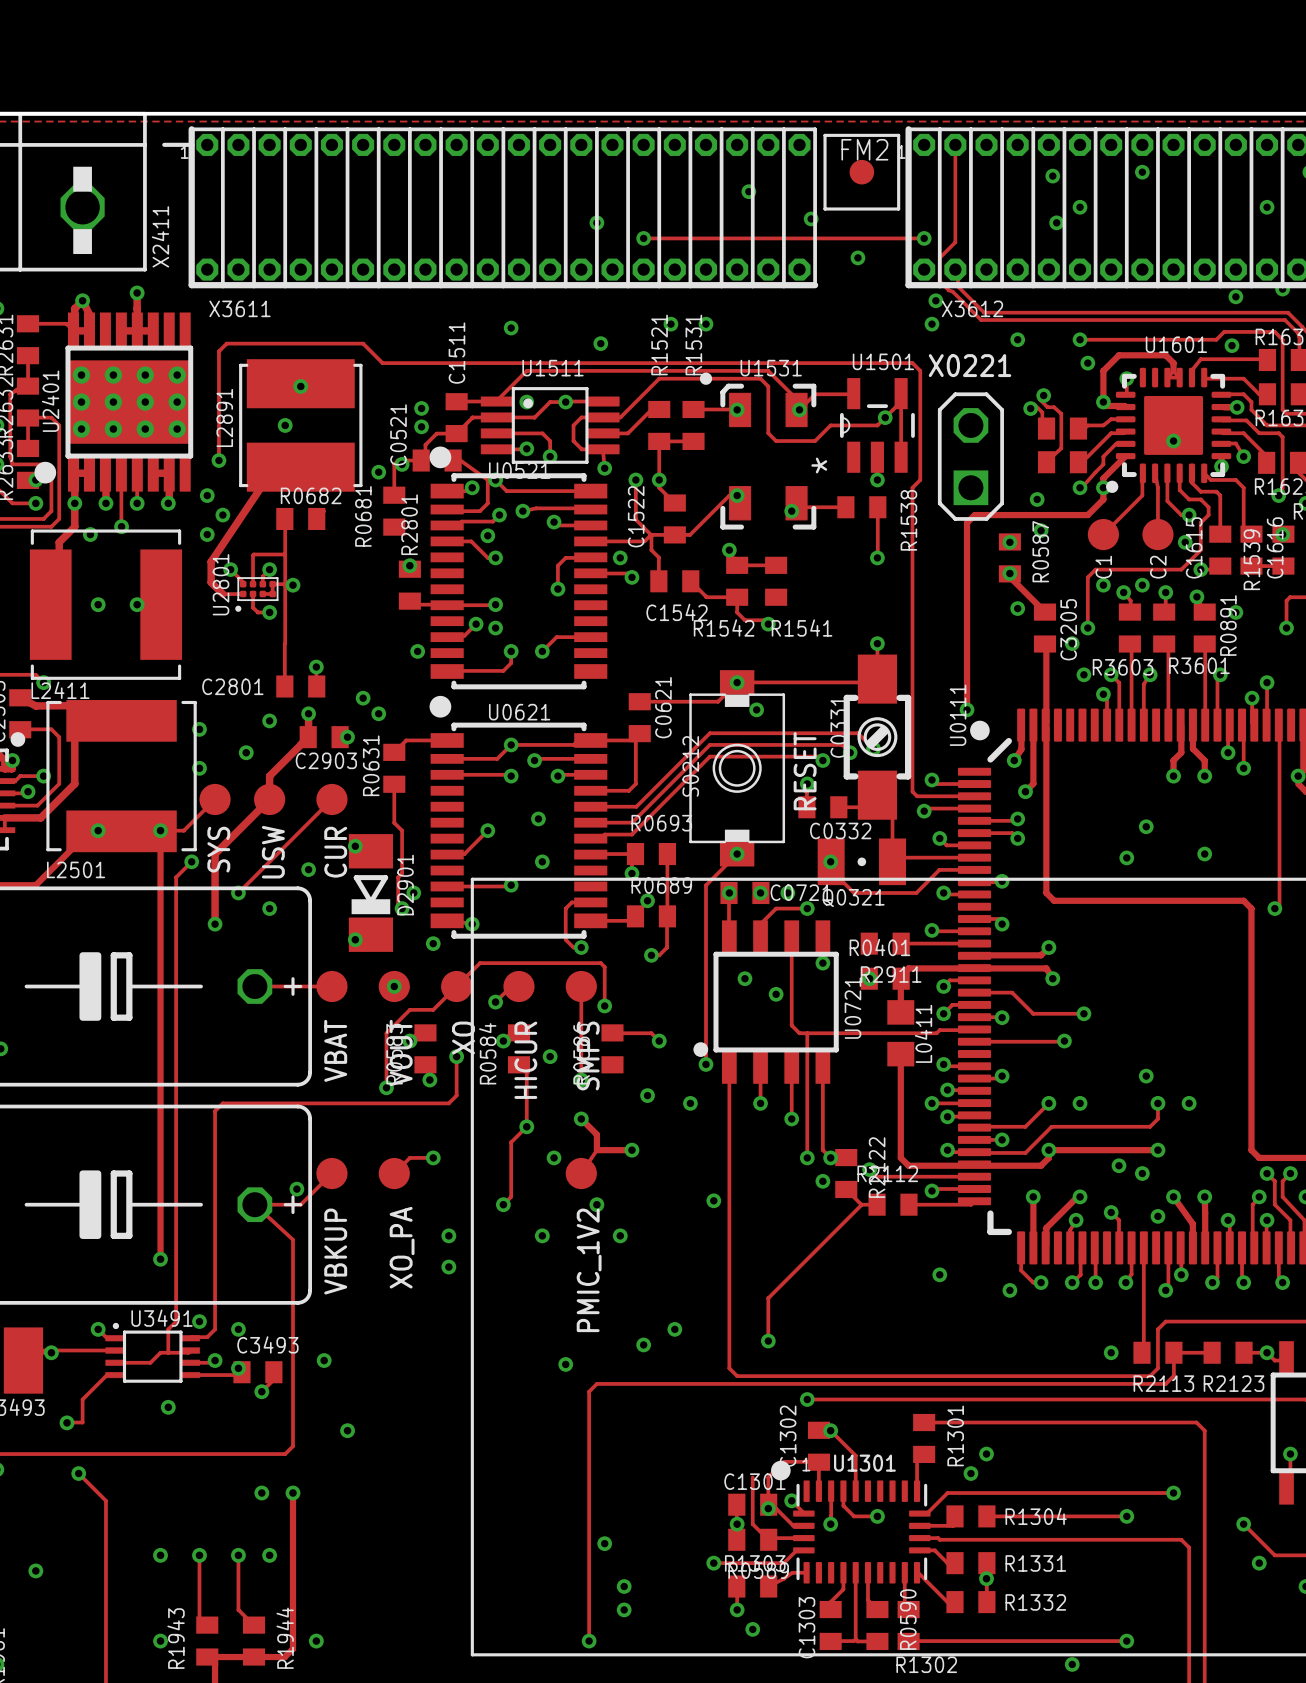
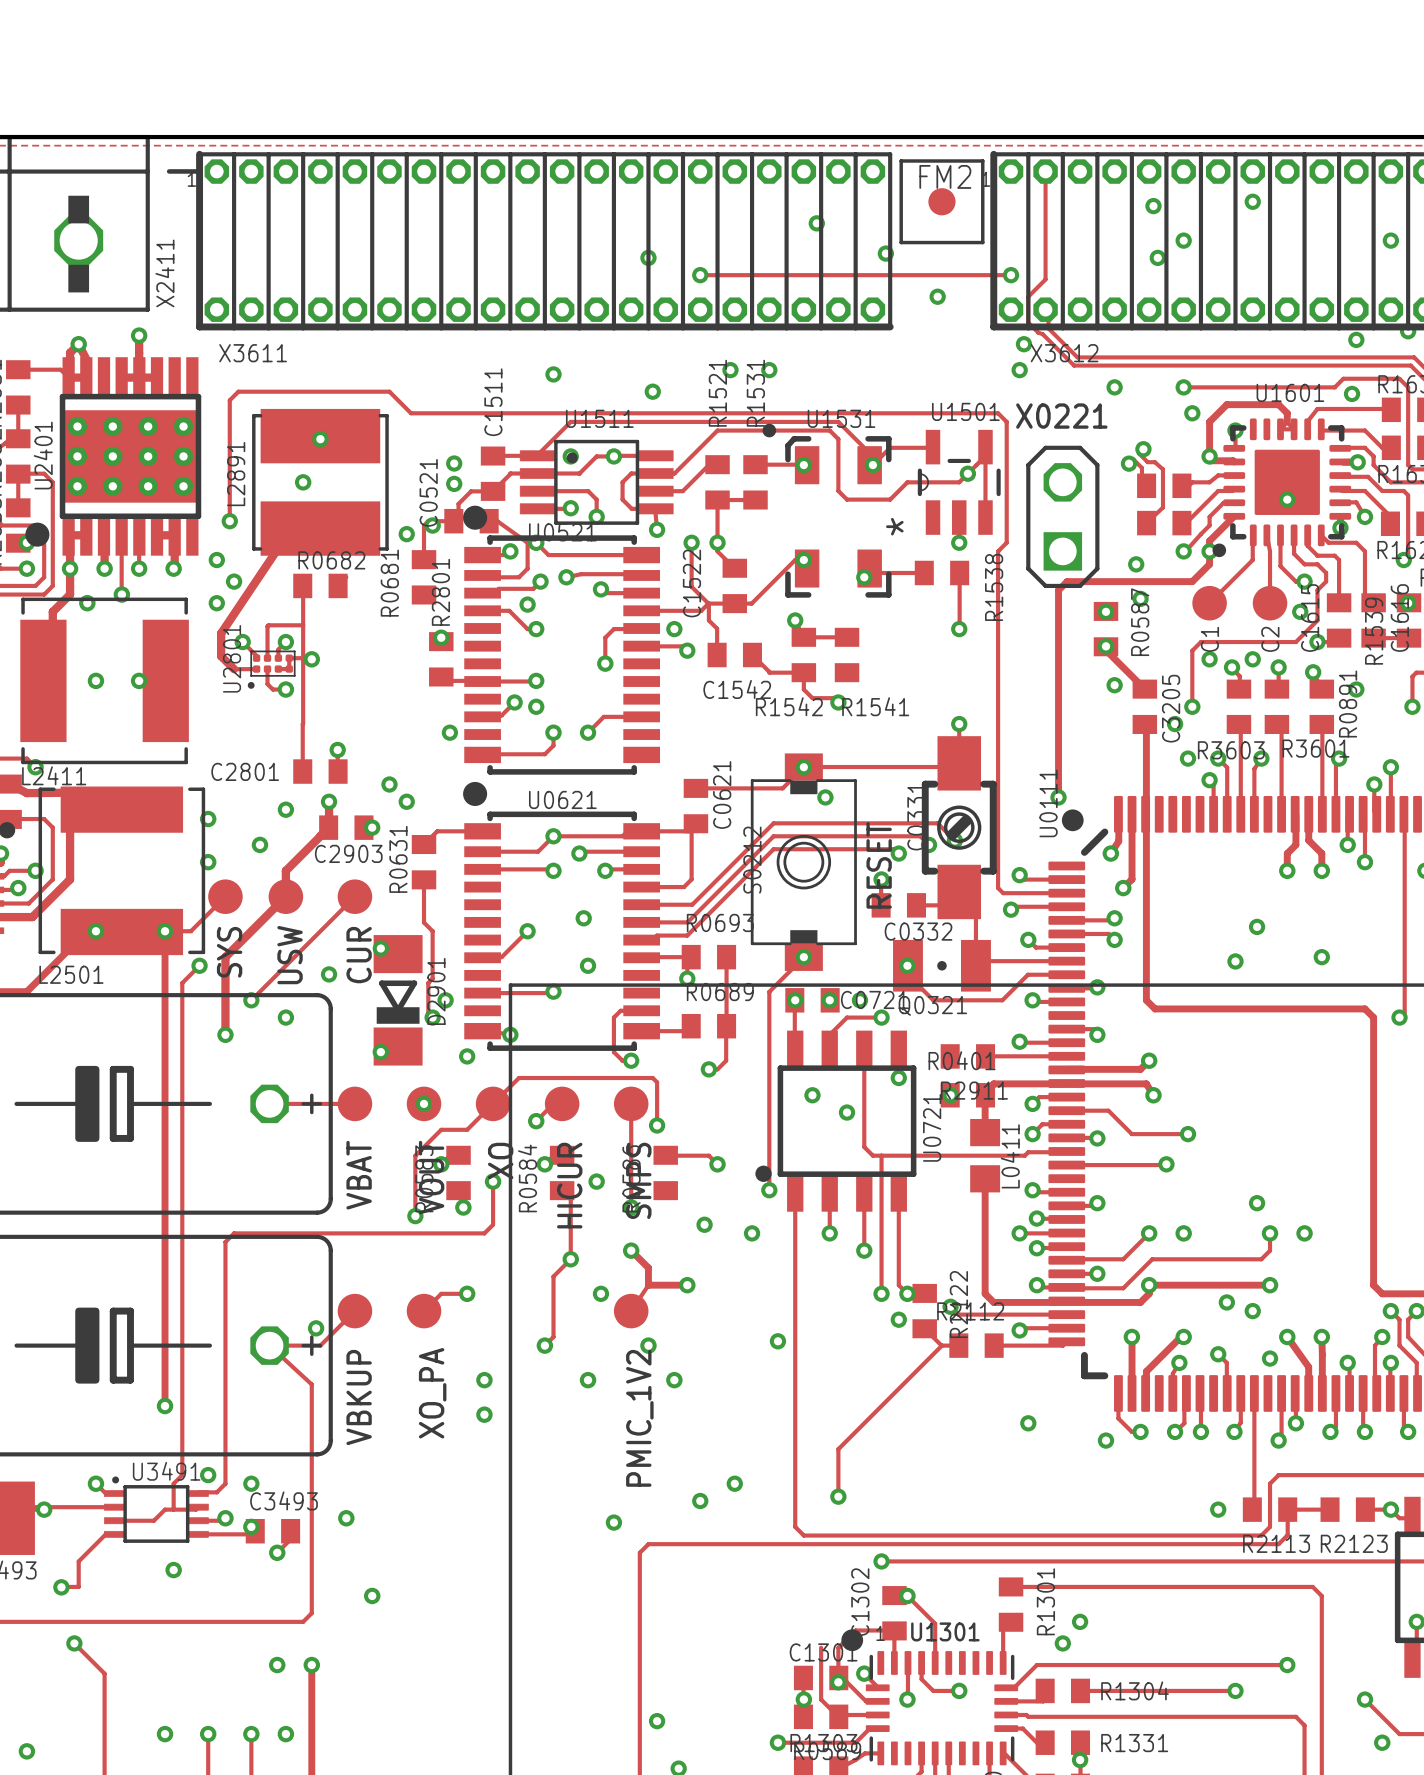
via: (647, 900) -> none

